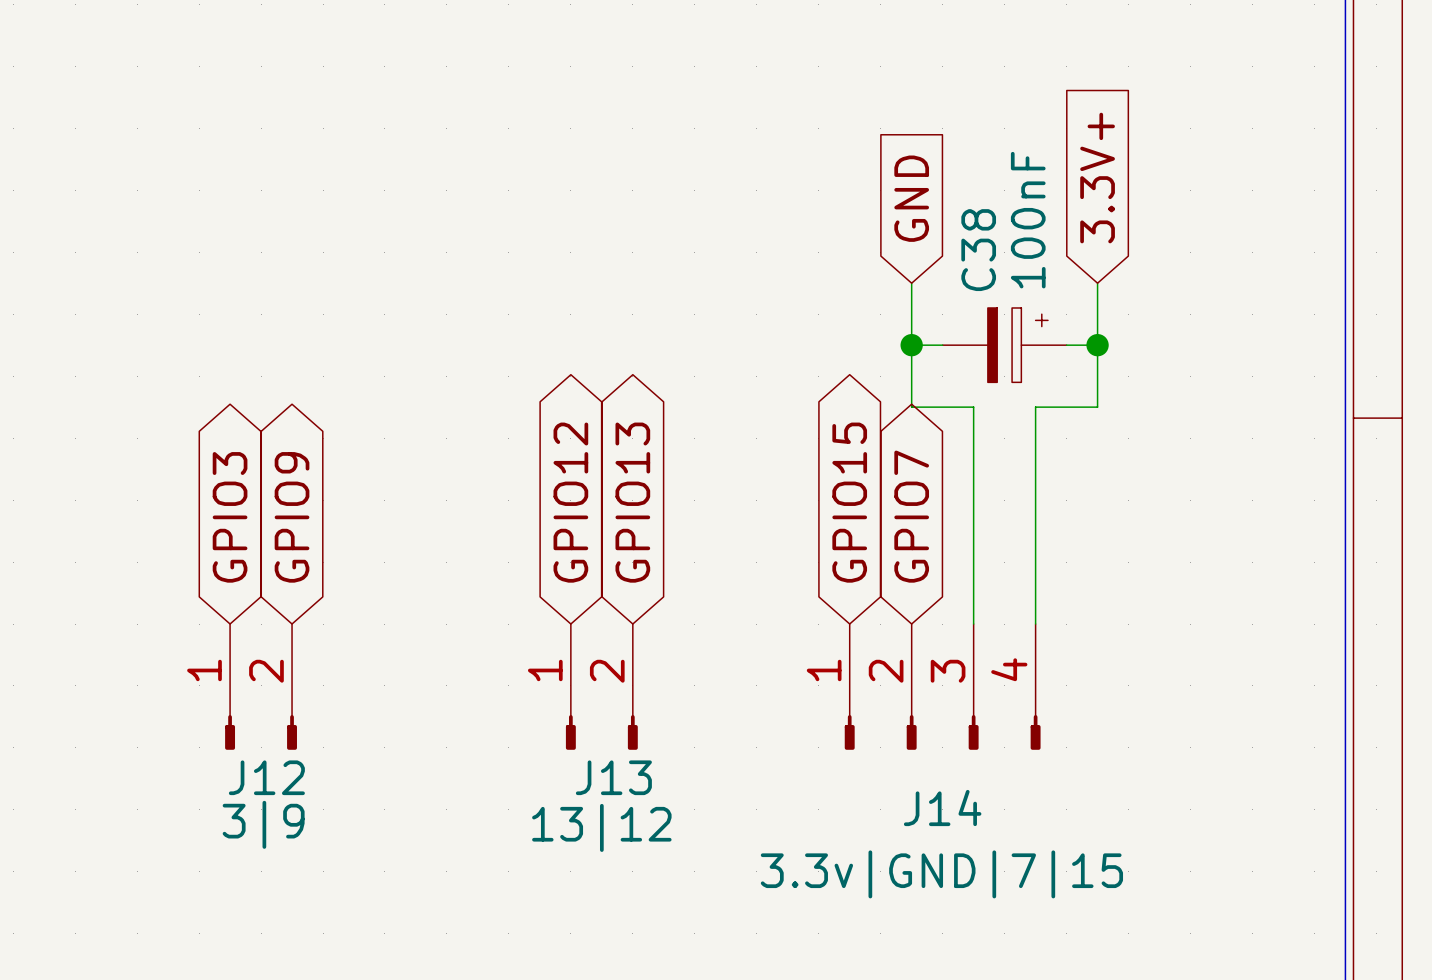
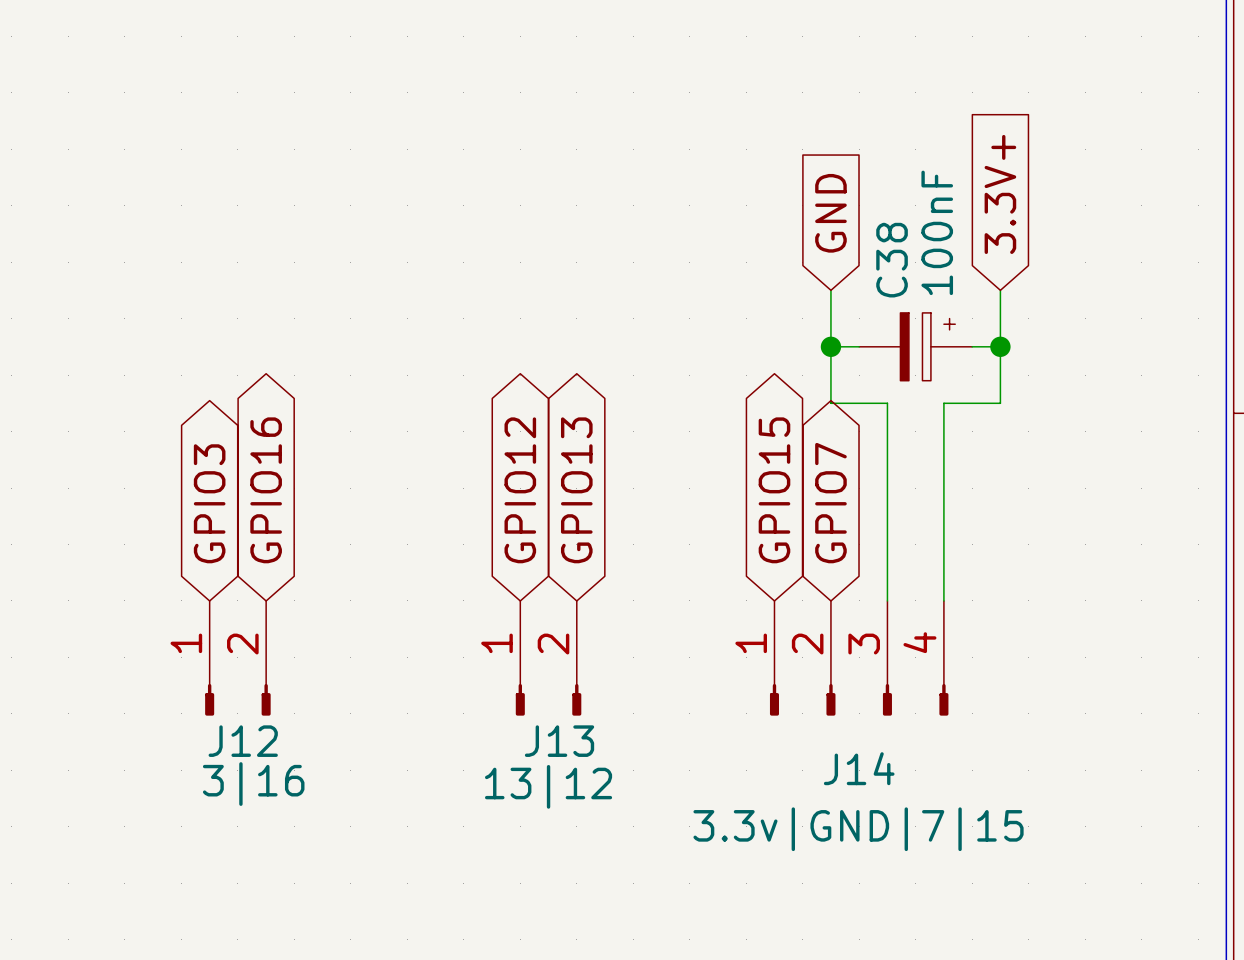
global label: GPIO9 (292, 517) -> GPIO16 (266, 490)
J12 value: 3|9 (263, 824) -> 3|16 (253, 784)

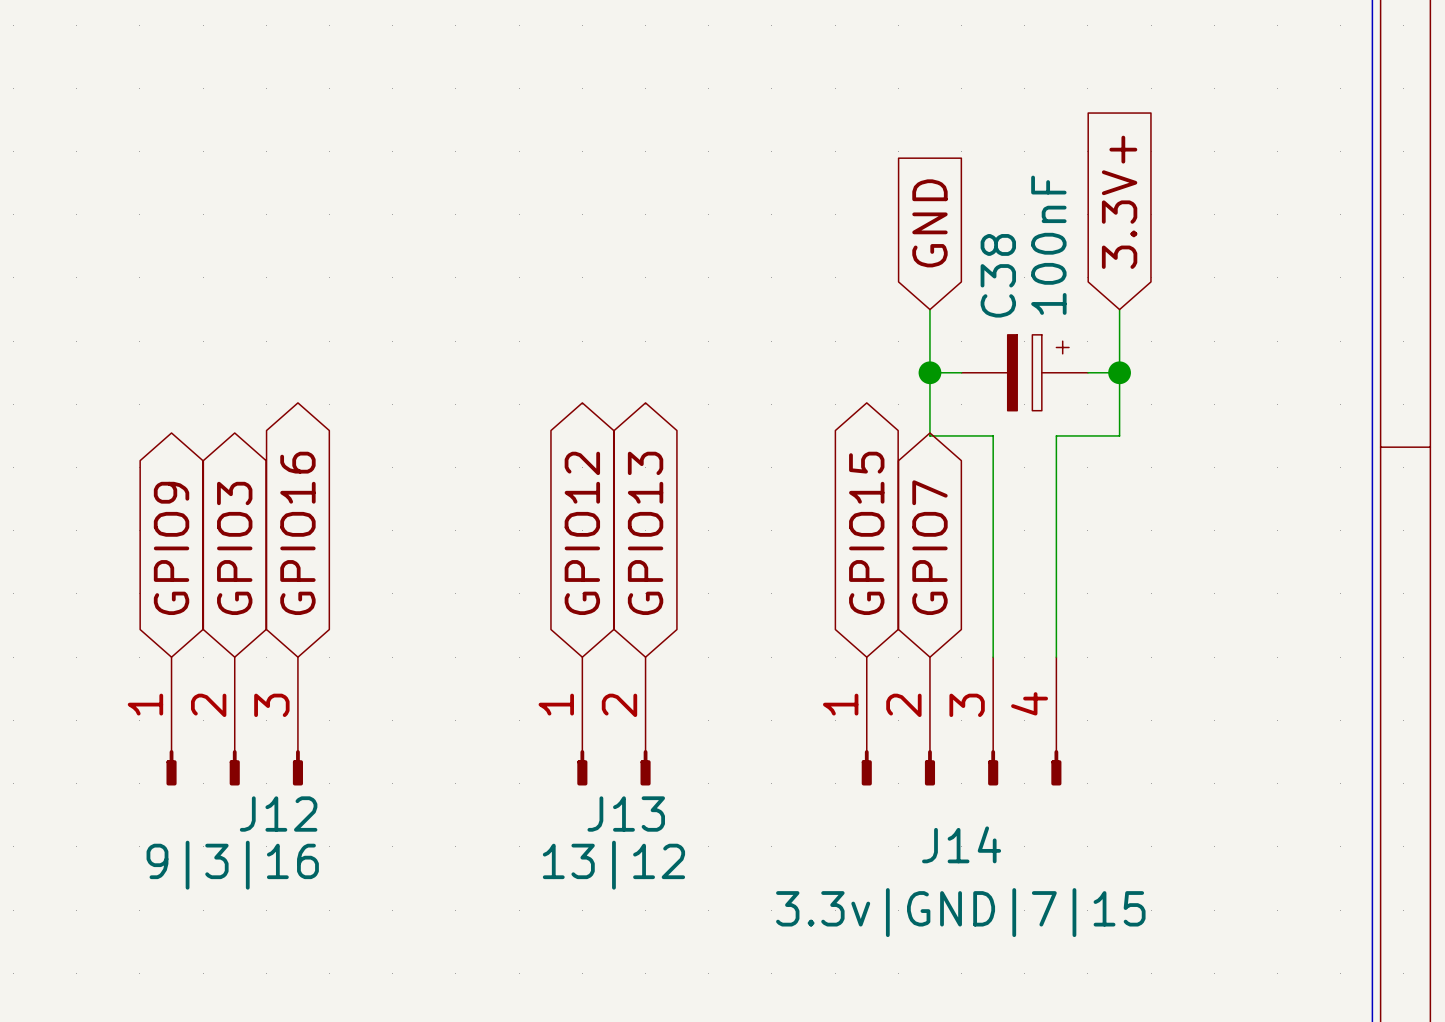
global label: none -> GPIO9 (171, 548)
J12 symbol: [205, 600, 271, 716] -> [166, 657, 303, 786]
J12 value: 3|16 (253, 784) -> 9|3|16 (232, 865)

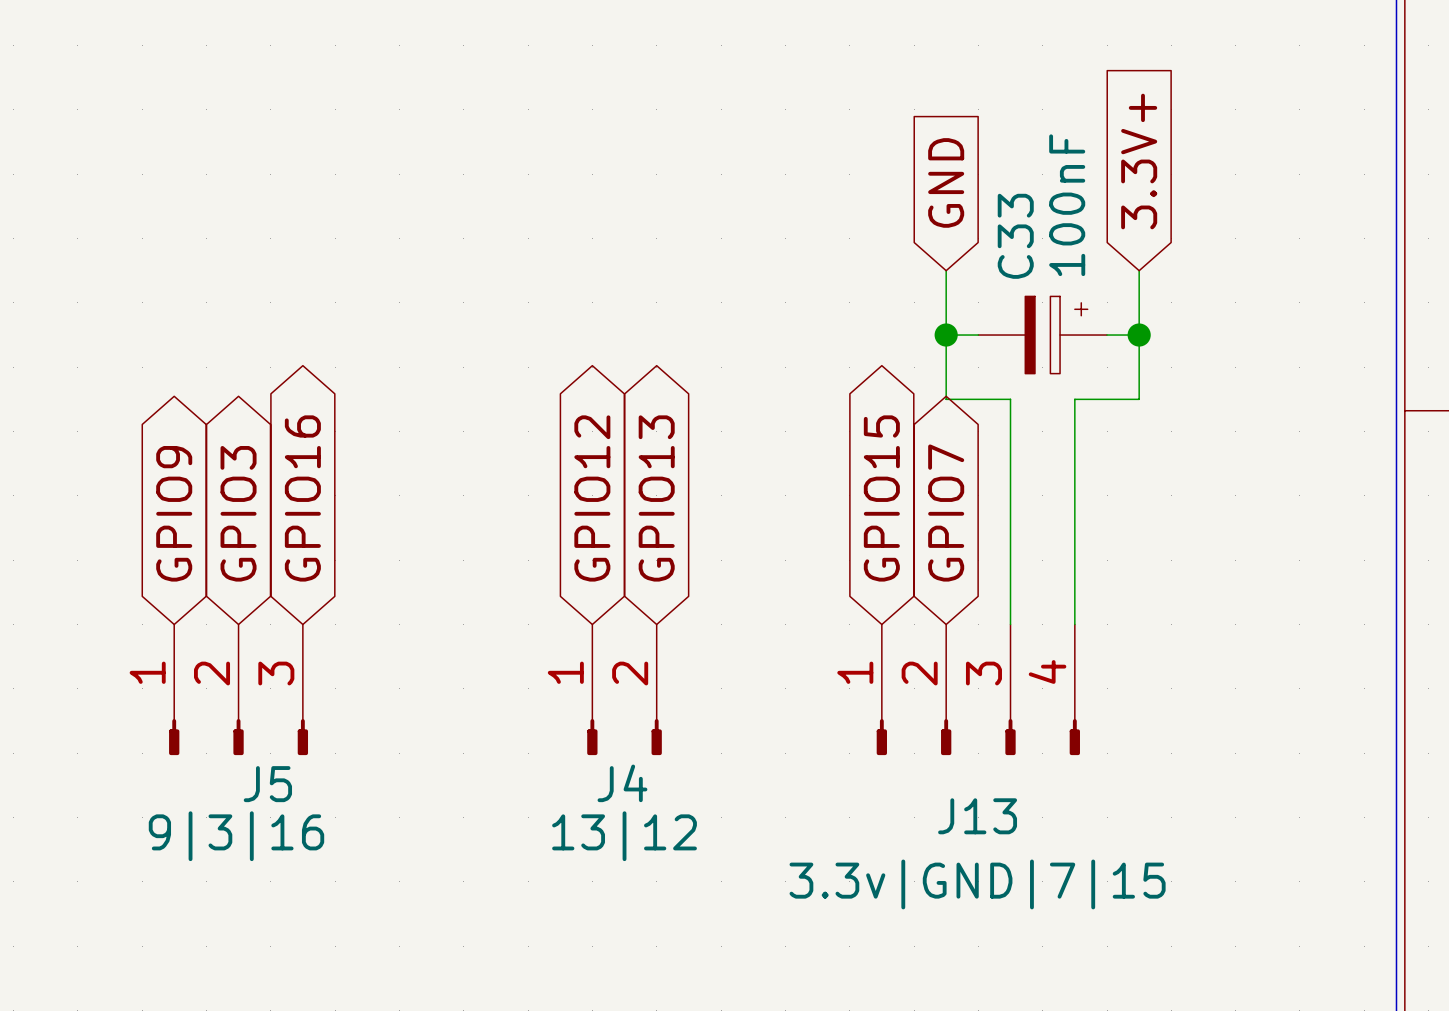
C38 name: C38 (998, 275) -> C33 (1015, 236)
J12 name: J12 (278, 814) -> J5 (267, 784)
J13 name: J13 (626, 814) -> J4 (622, 783)
J14 name: J14 (961, 844) -> J13 (977, 816)

